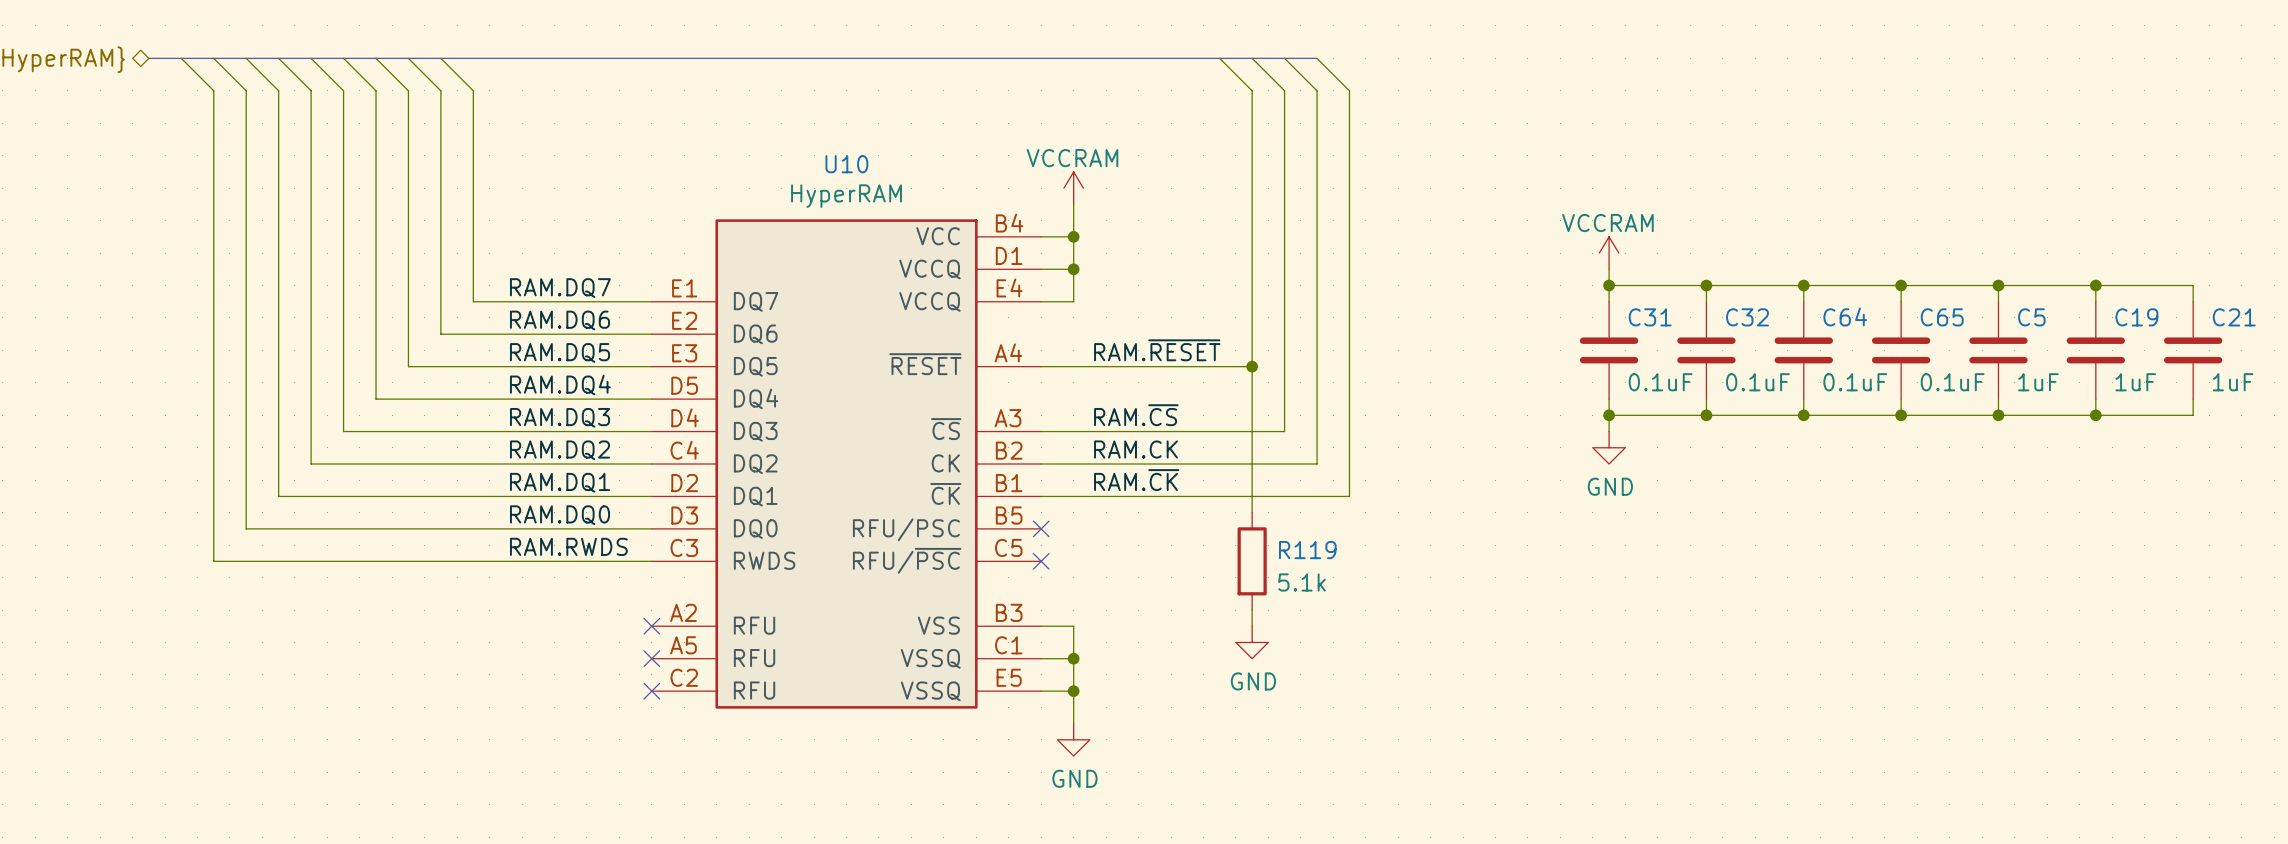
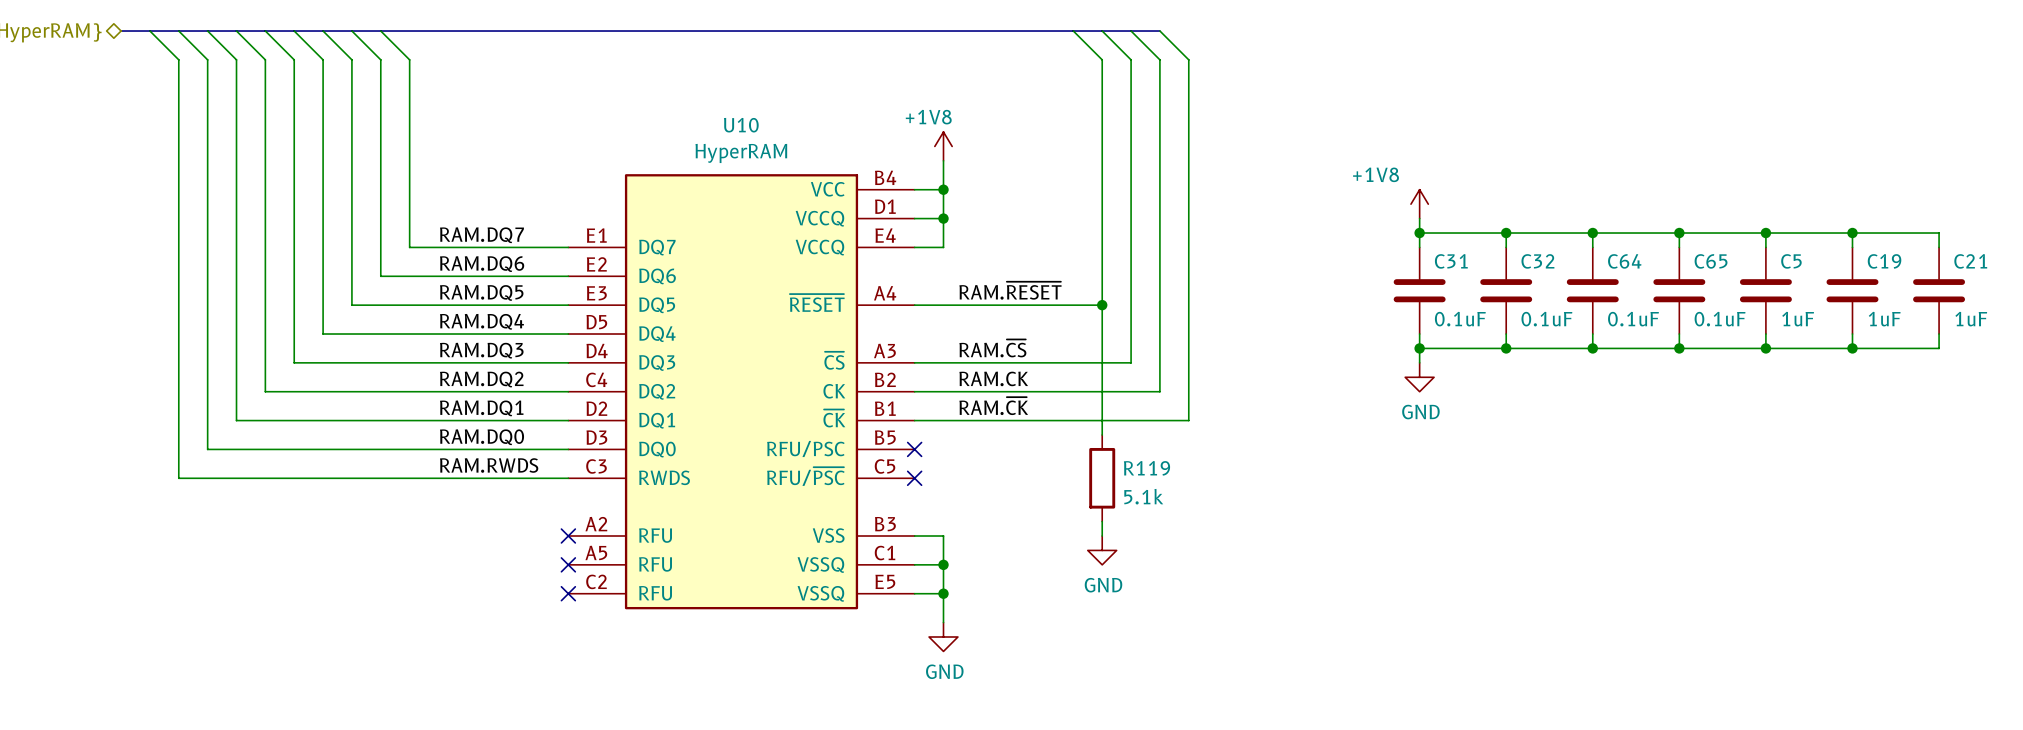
power symbol: VCCRAM (1073, 188) -> +1V8 (943, 146)
power symbol: VCCRAM (1609, 253) -> +1V8 (1419, 204)

